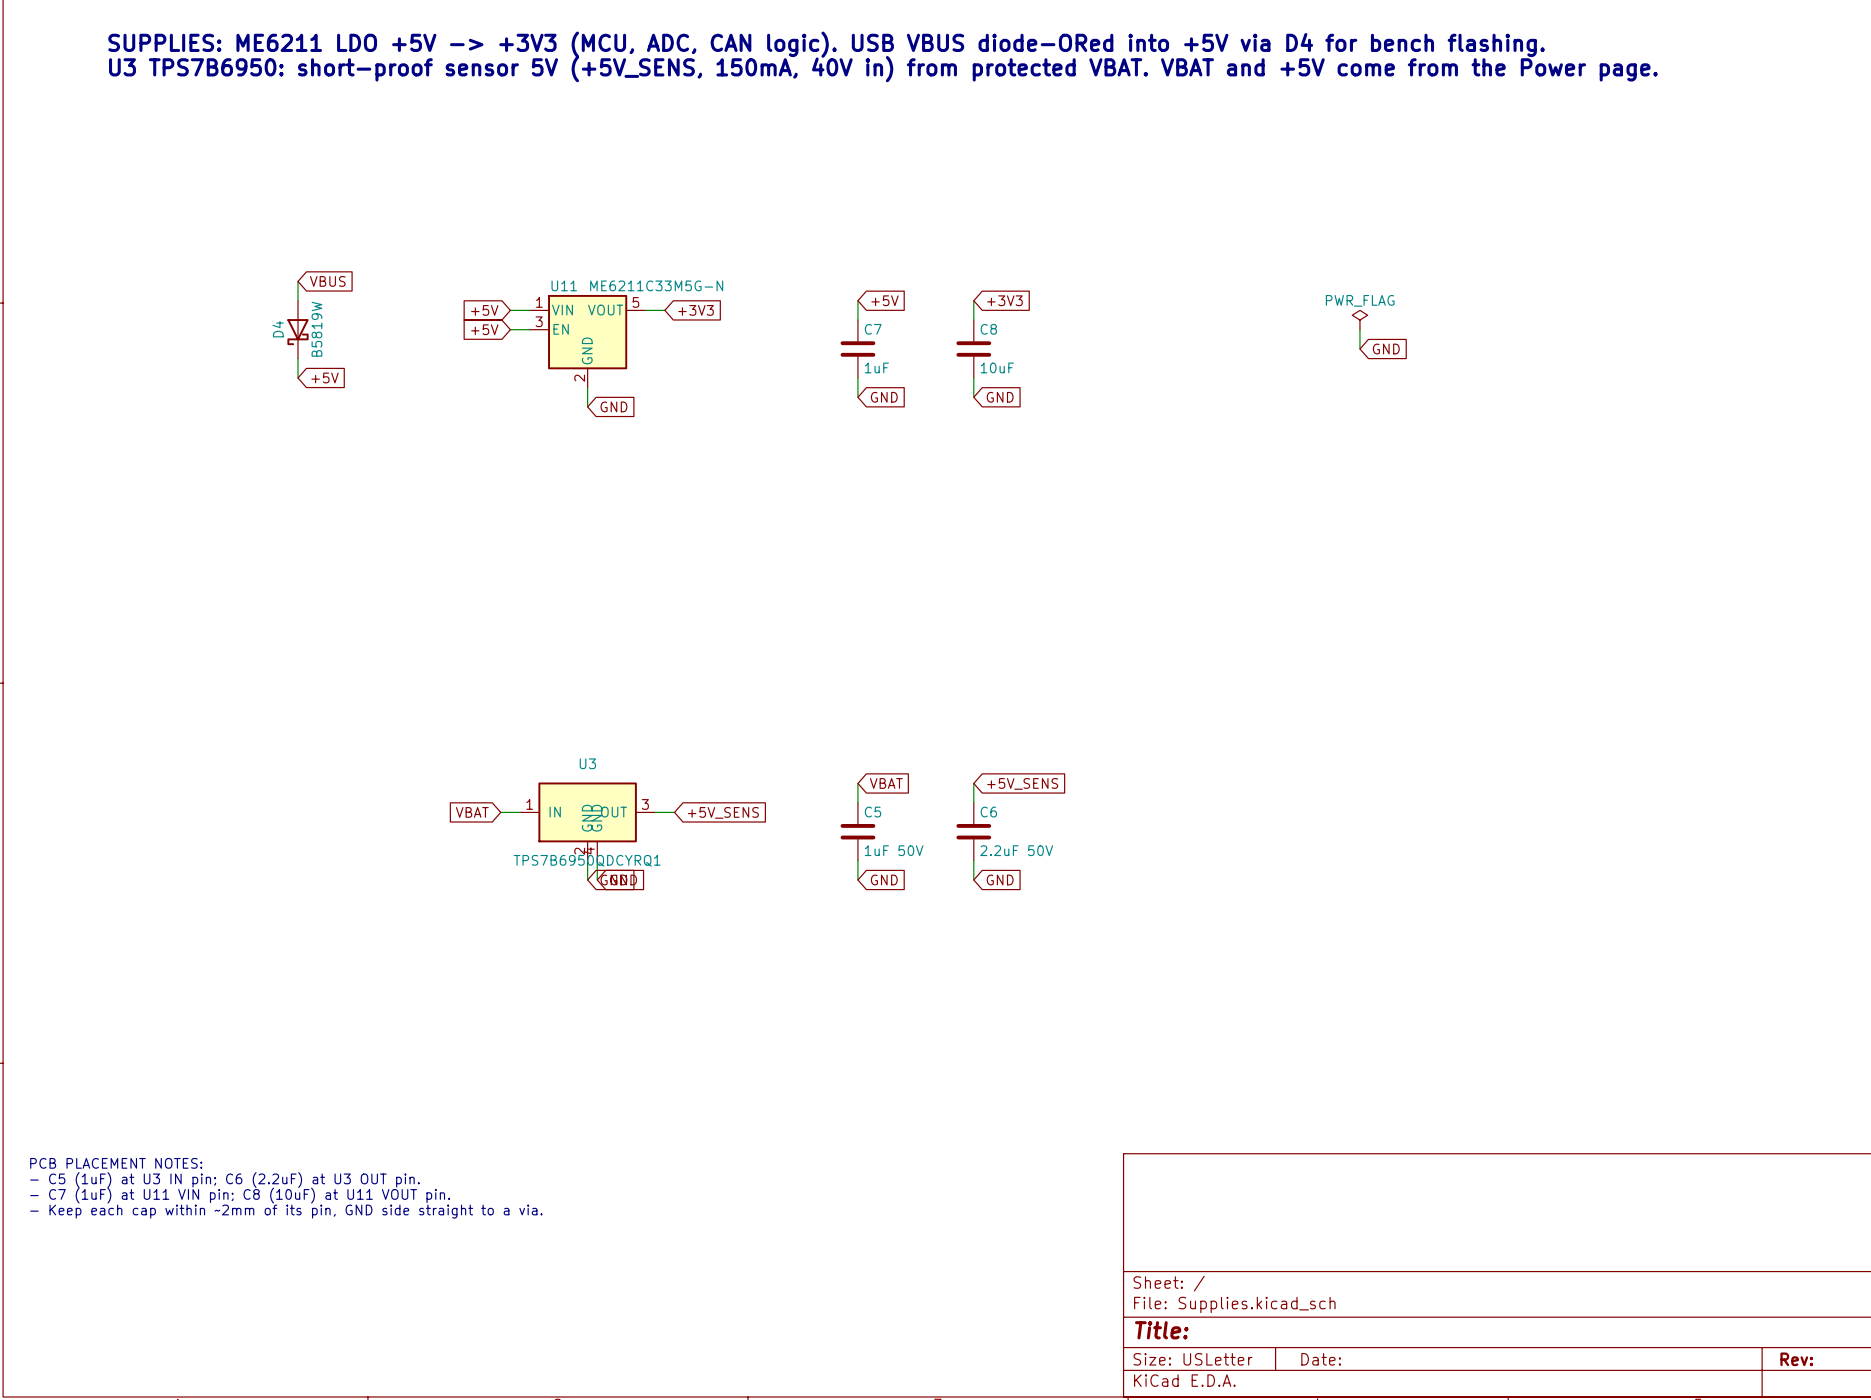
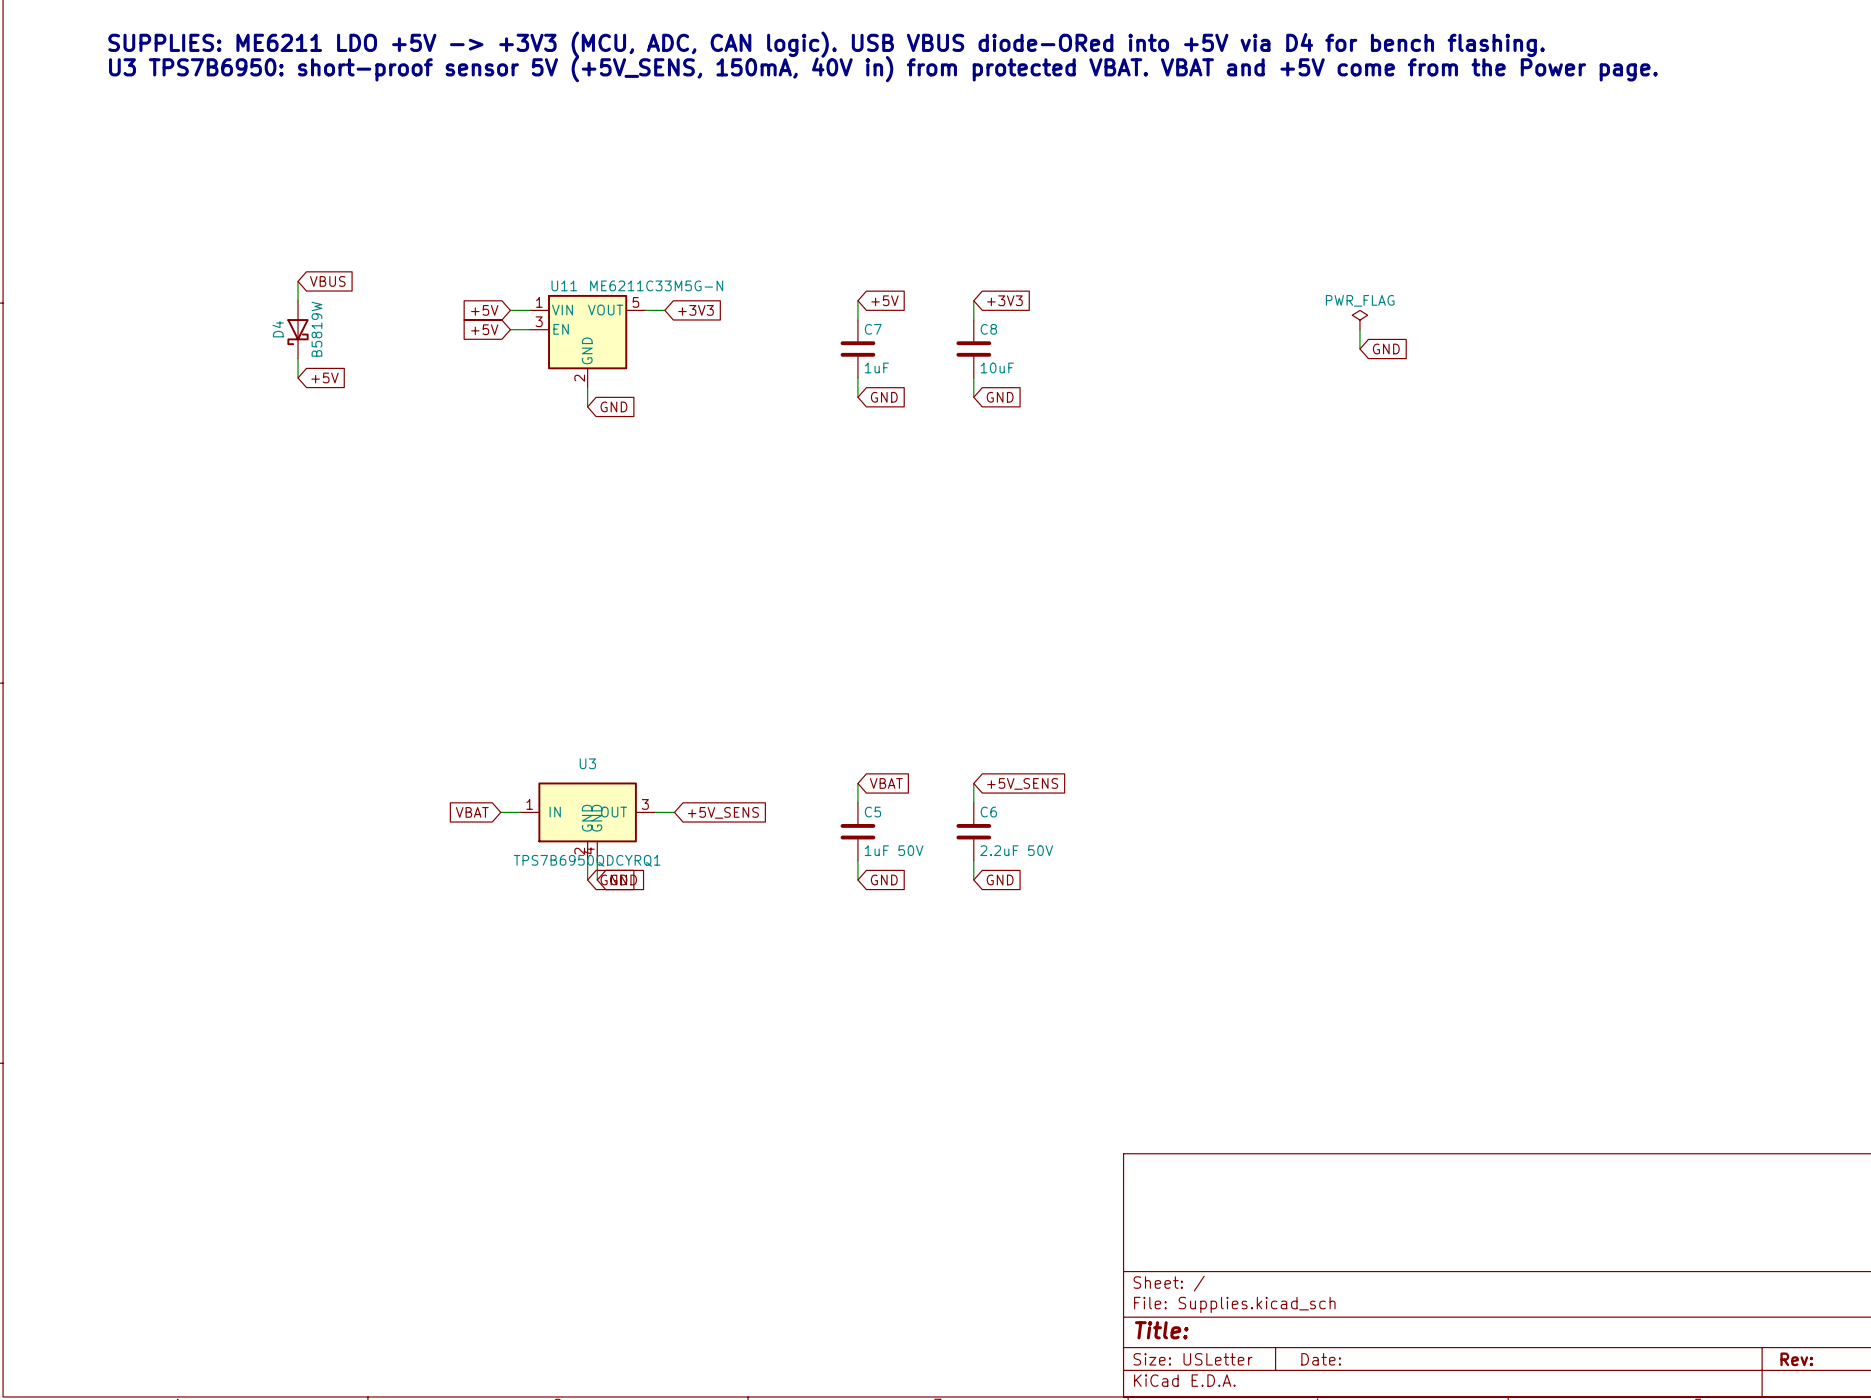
text: PCB PLACEMENT NOTES: (116, 1163) -> none
text: - C5 (1uF) at U3 IN pin; C6 (2.2uF) at U3 OUT pin. (224, 1180) -> none
text: - C7 (1uF) at U11 VIN pin; C8 (10uF) at U11 VOUT pin. (240, 1195) -> none
text: - Keep each cap within ~2mm of its pin, GND side straight to a via. (286, 1211) -> none

